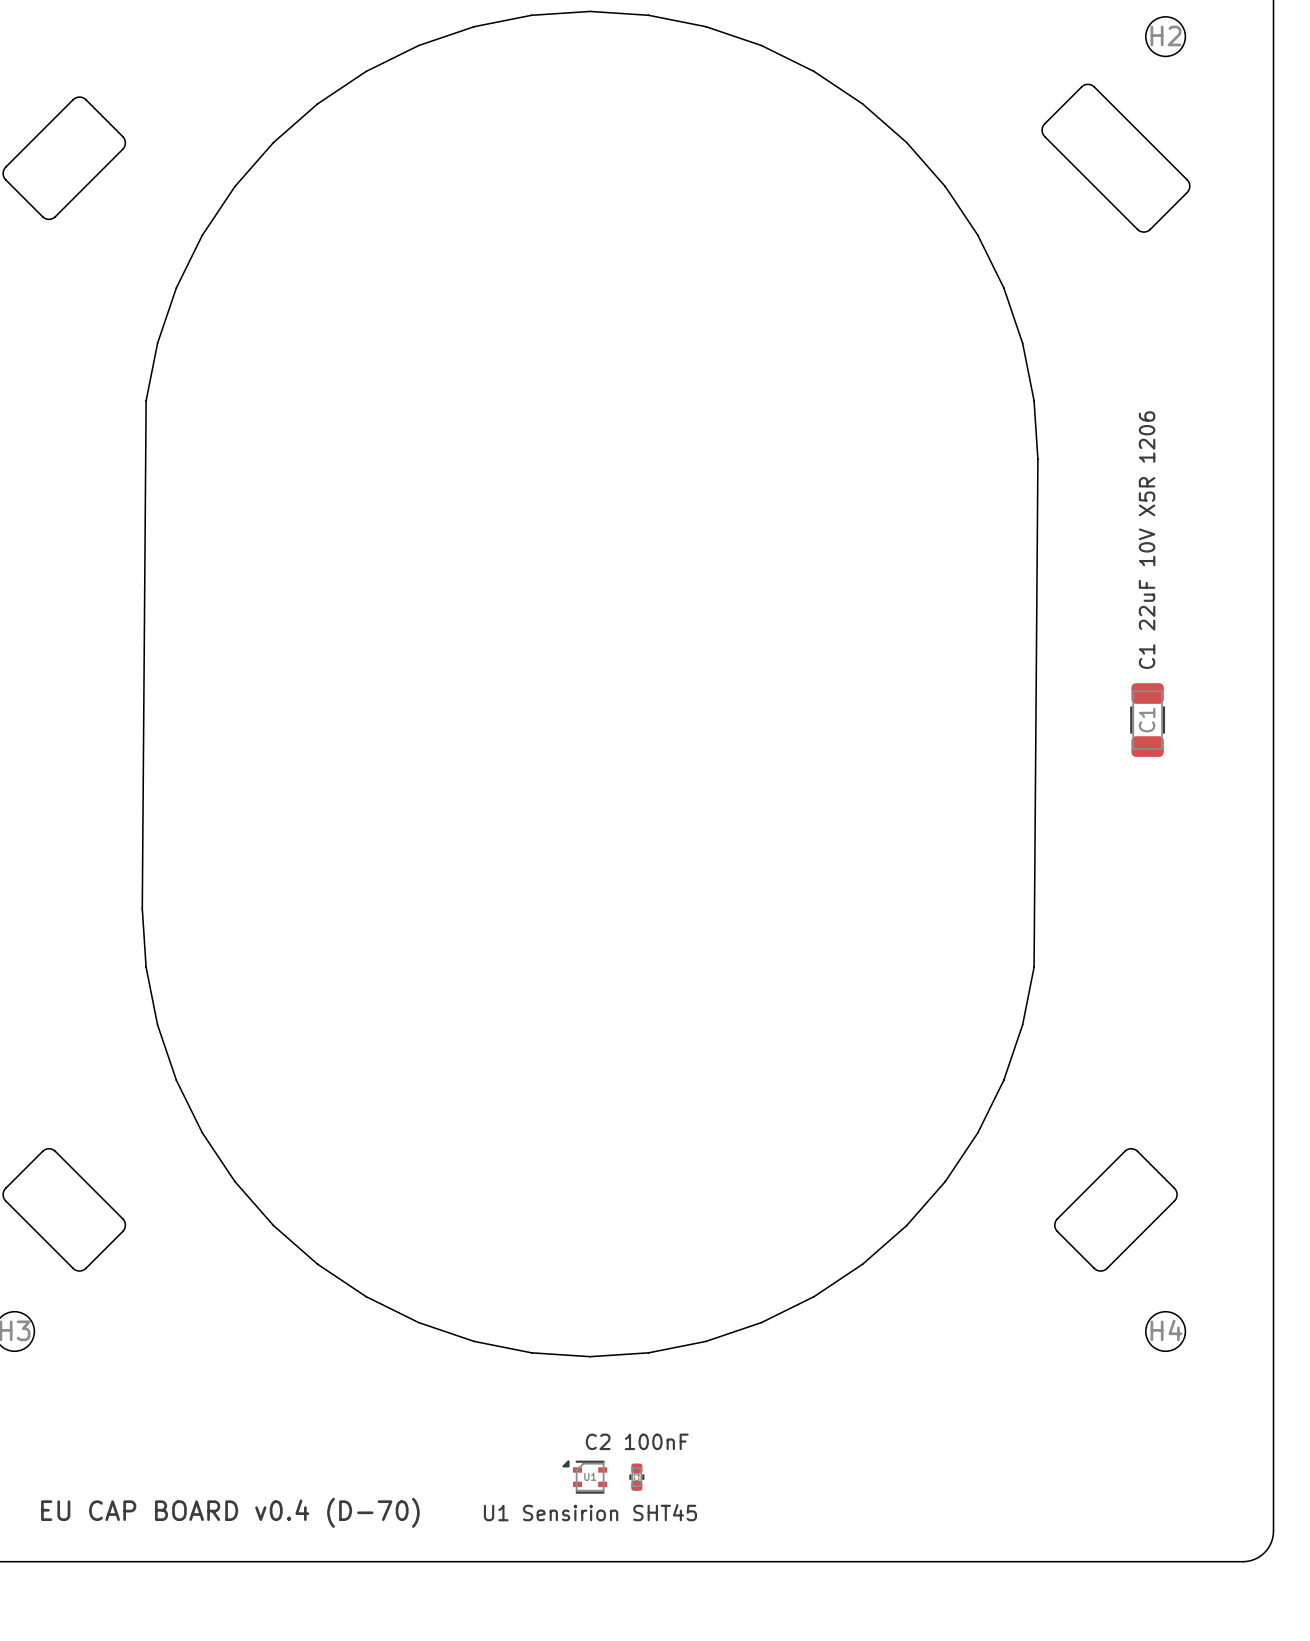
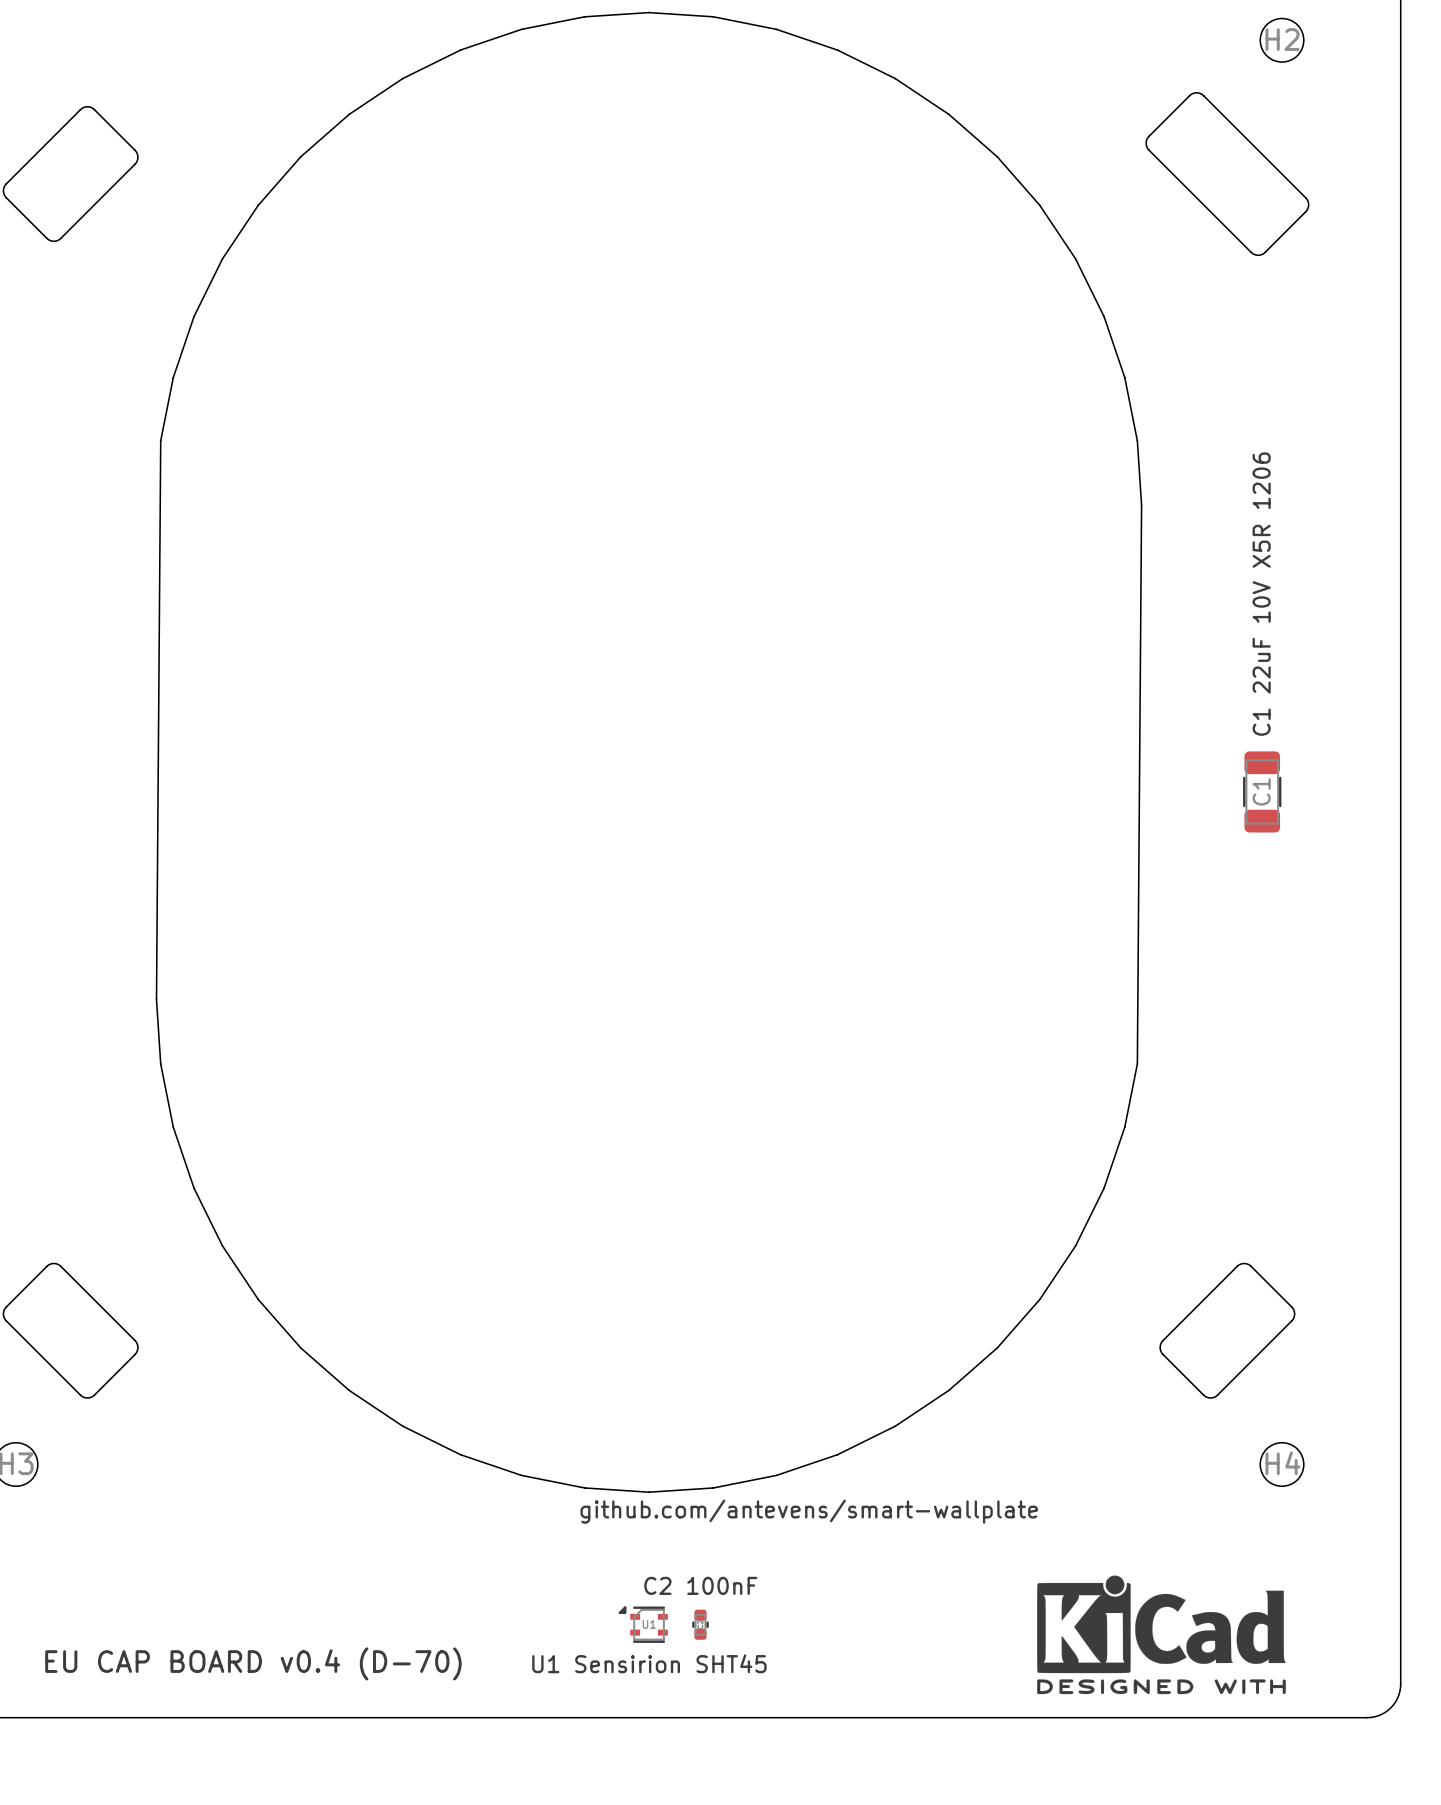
text: none -> github.com/antevens/smart-wallplate (809, 1511)
drawing: none -> [1037, 1575, 1286, 1695]

